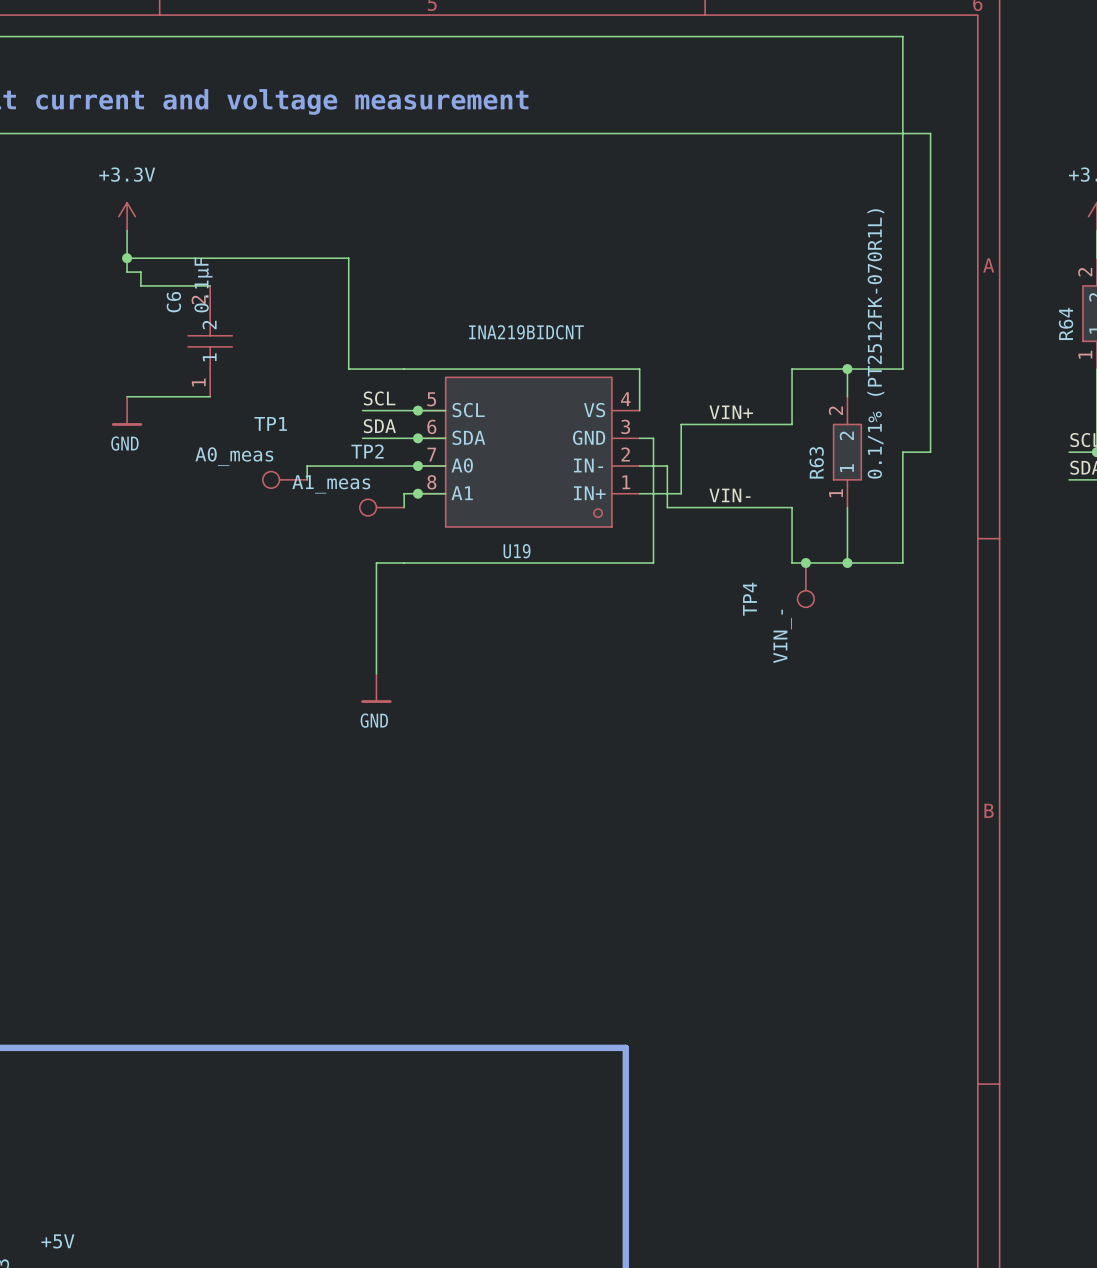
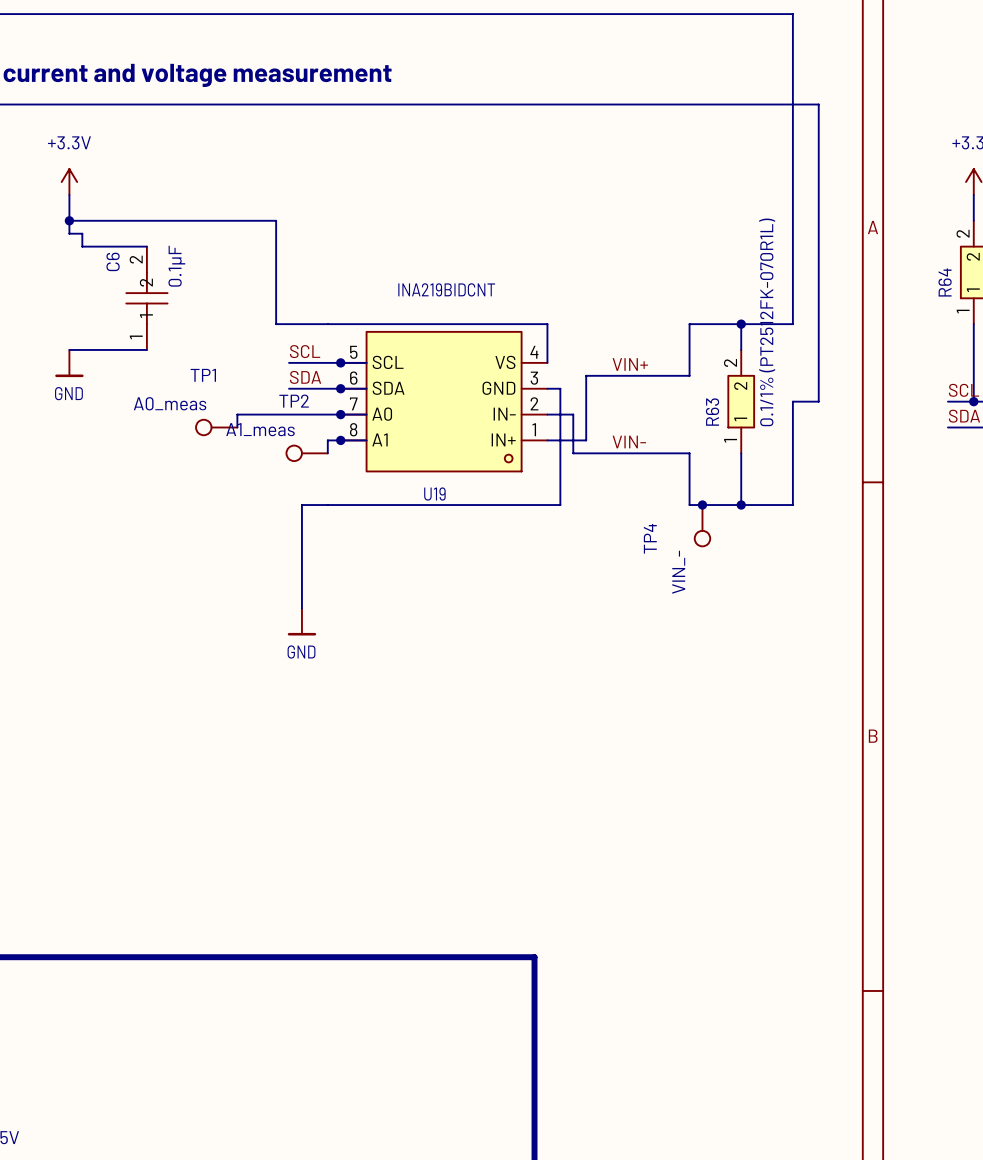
C6 value position: 0.1µF (203, 284) -> 0.1µF (176, 266)

